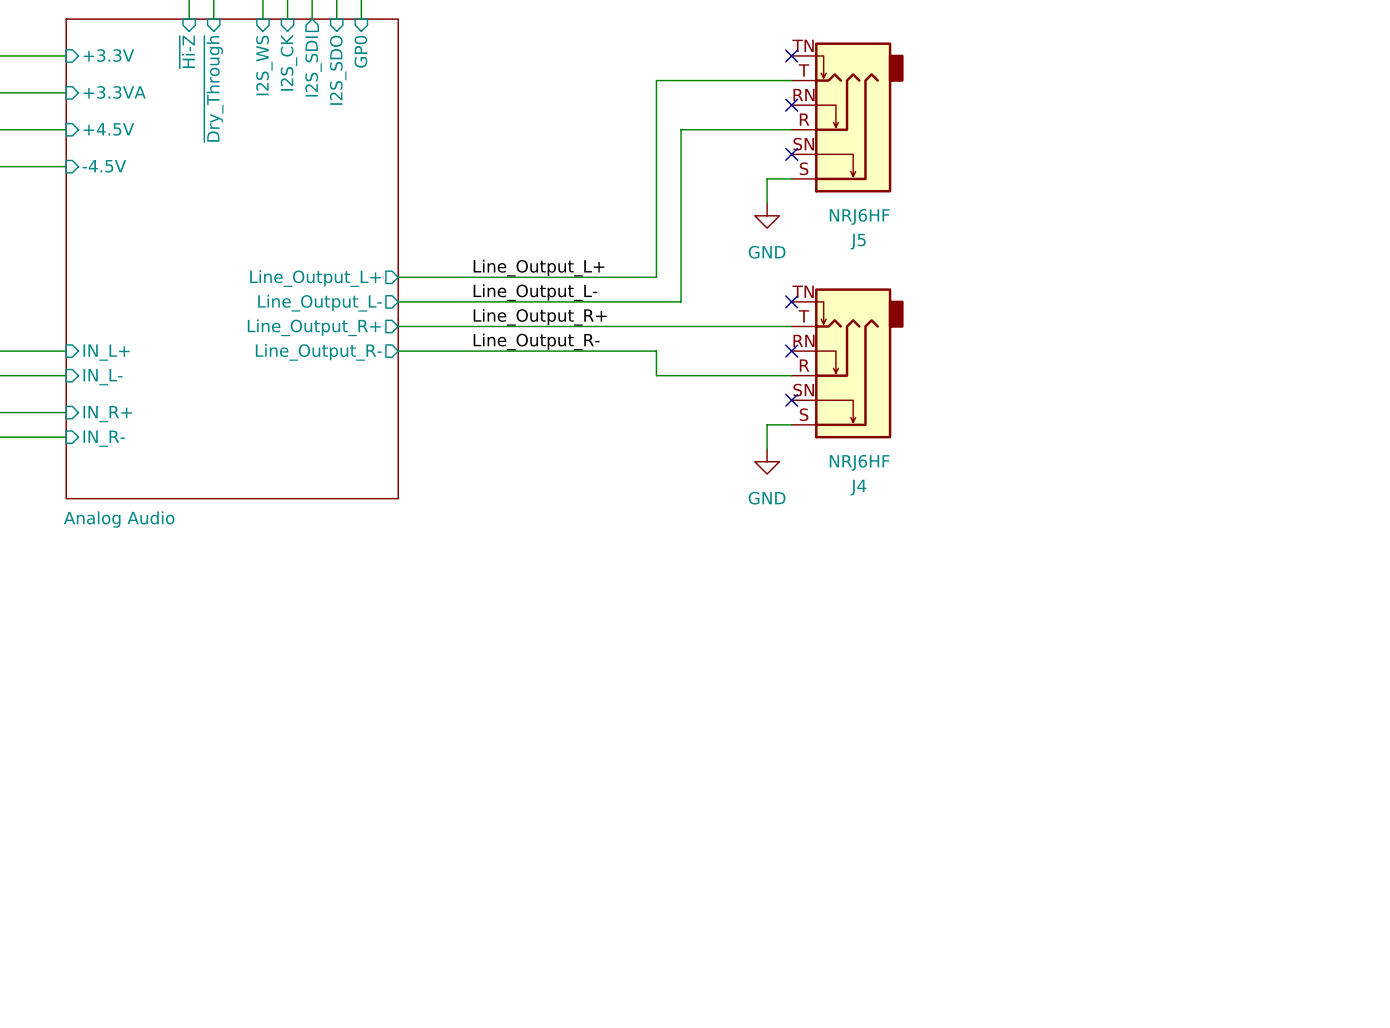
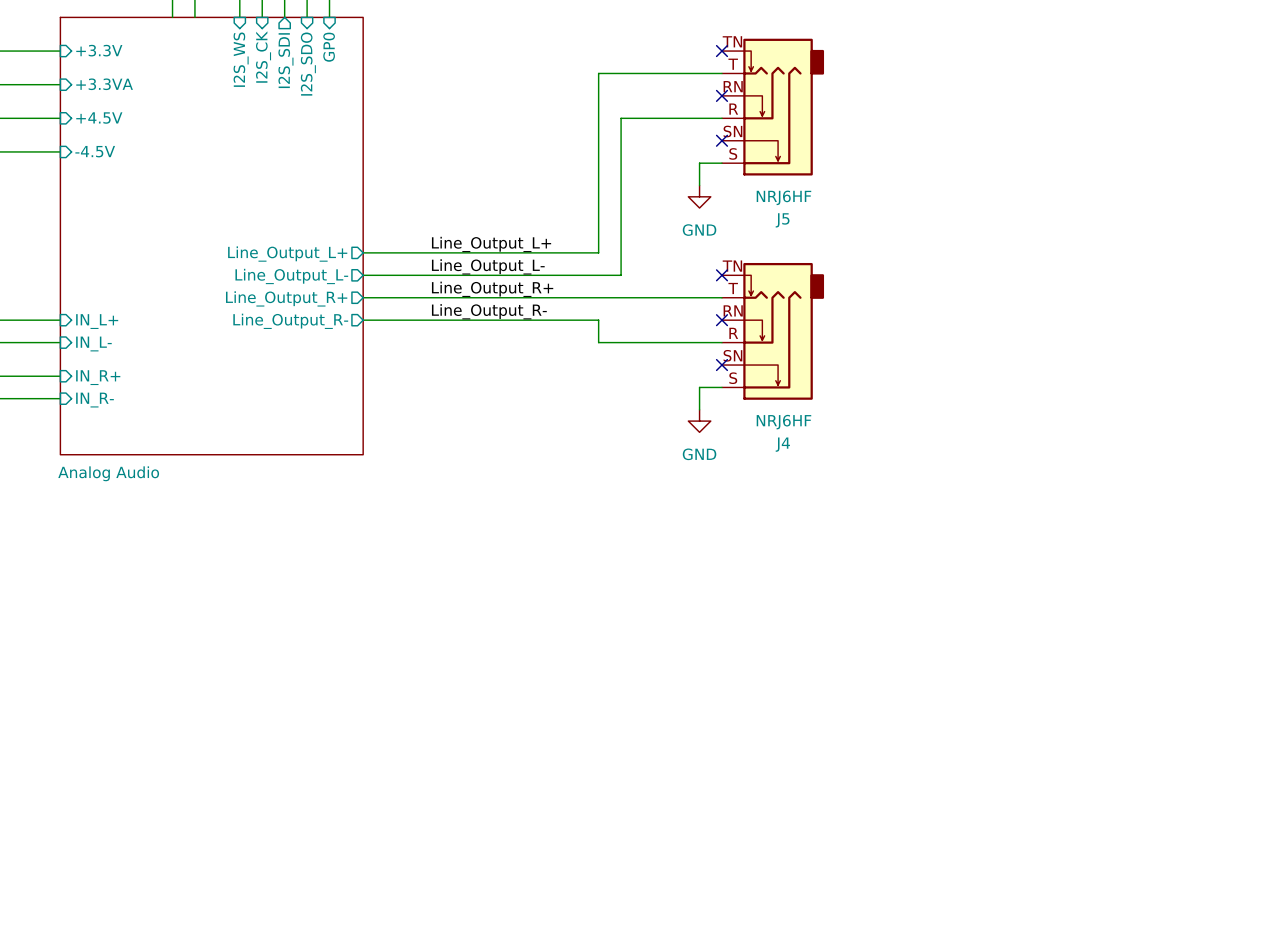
sheet pin: ~{Hi-Z} (187, 51) -> none
sheet pin: ~{Dry_Through} (213, 89) -> none

